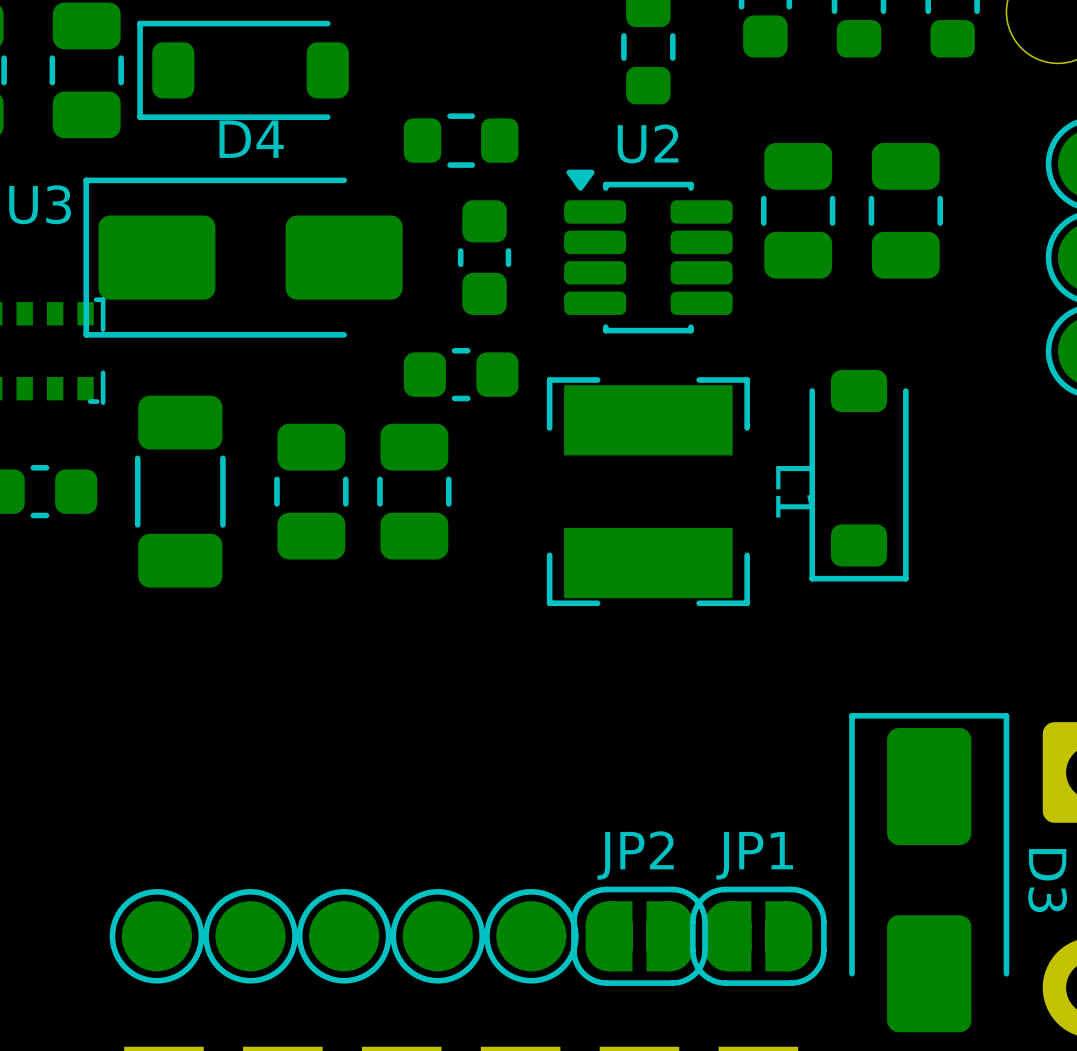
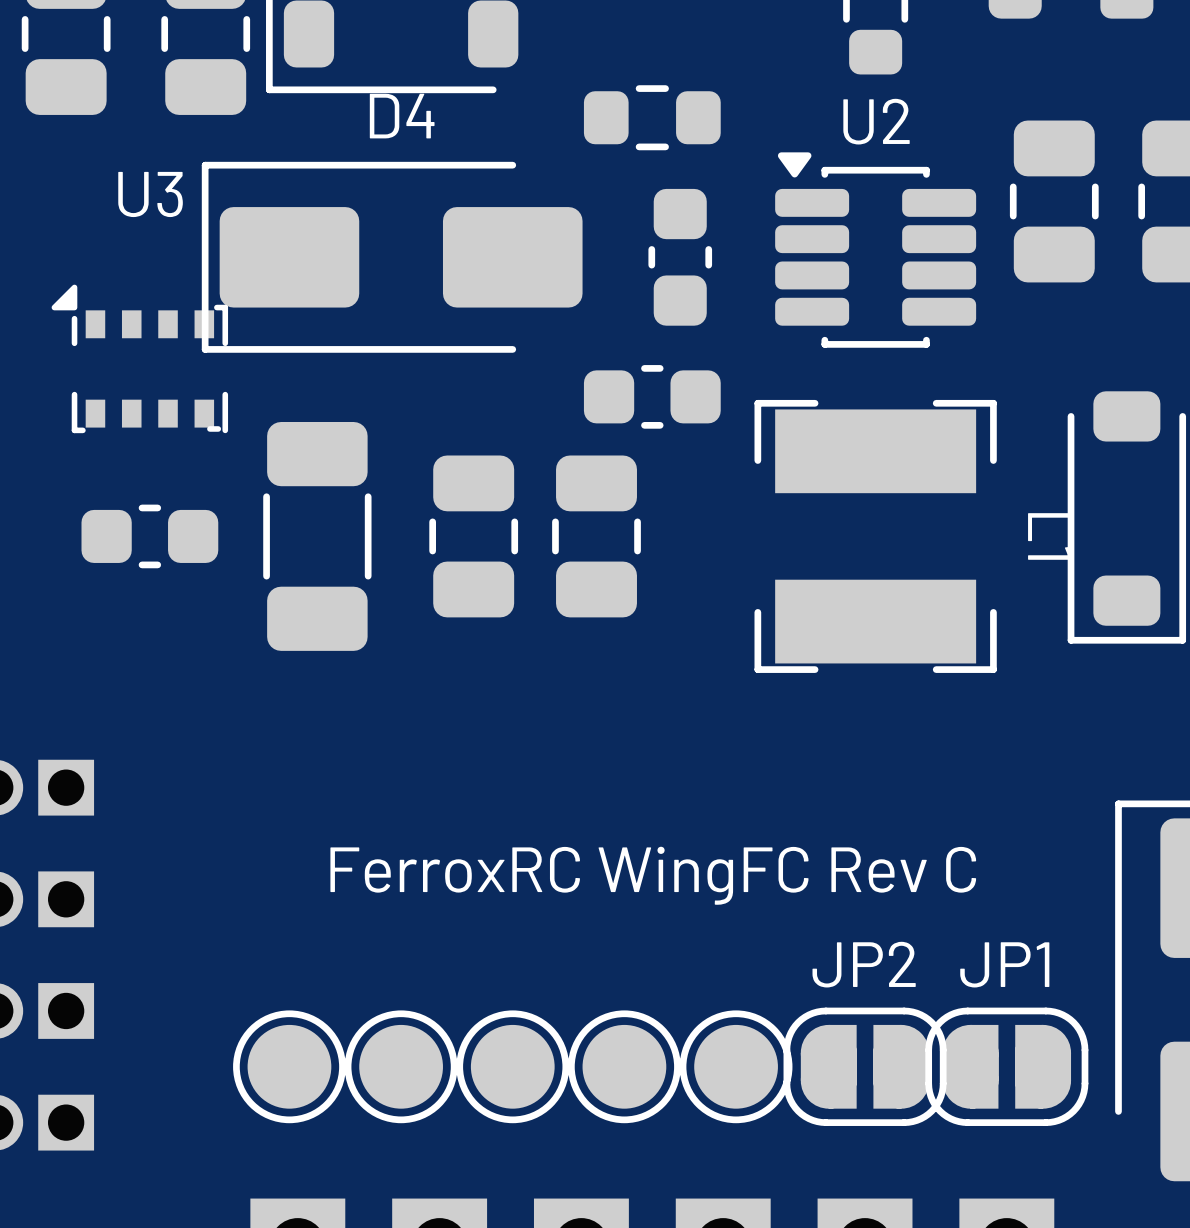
text: none -> FerroxRC WingFC Rev C (653, 875)

